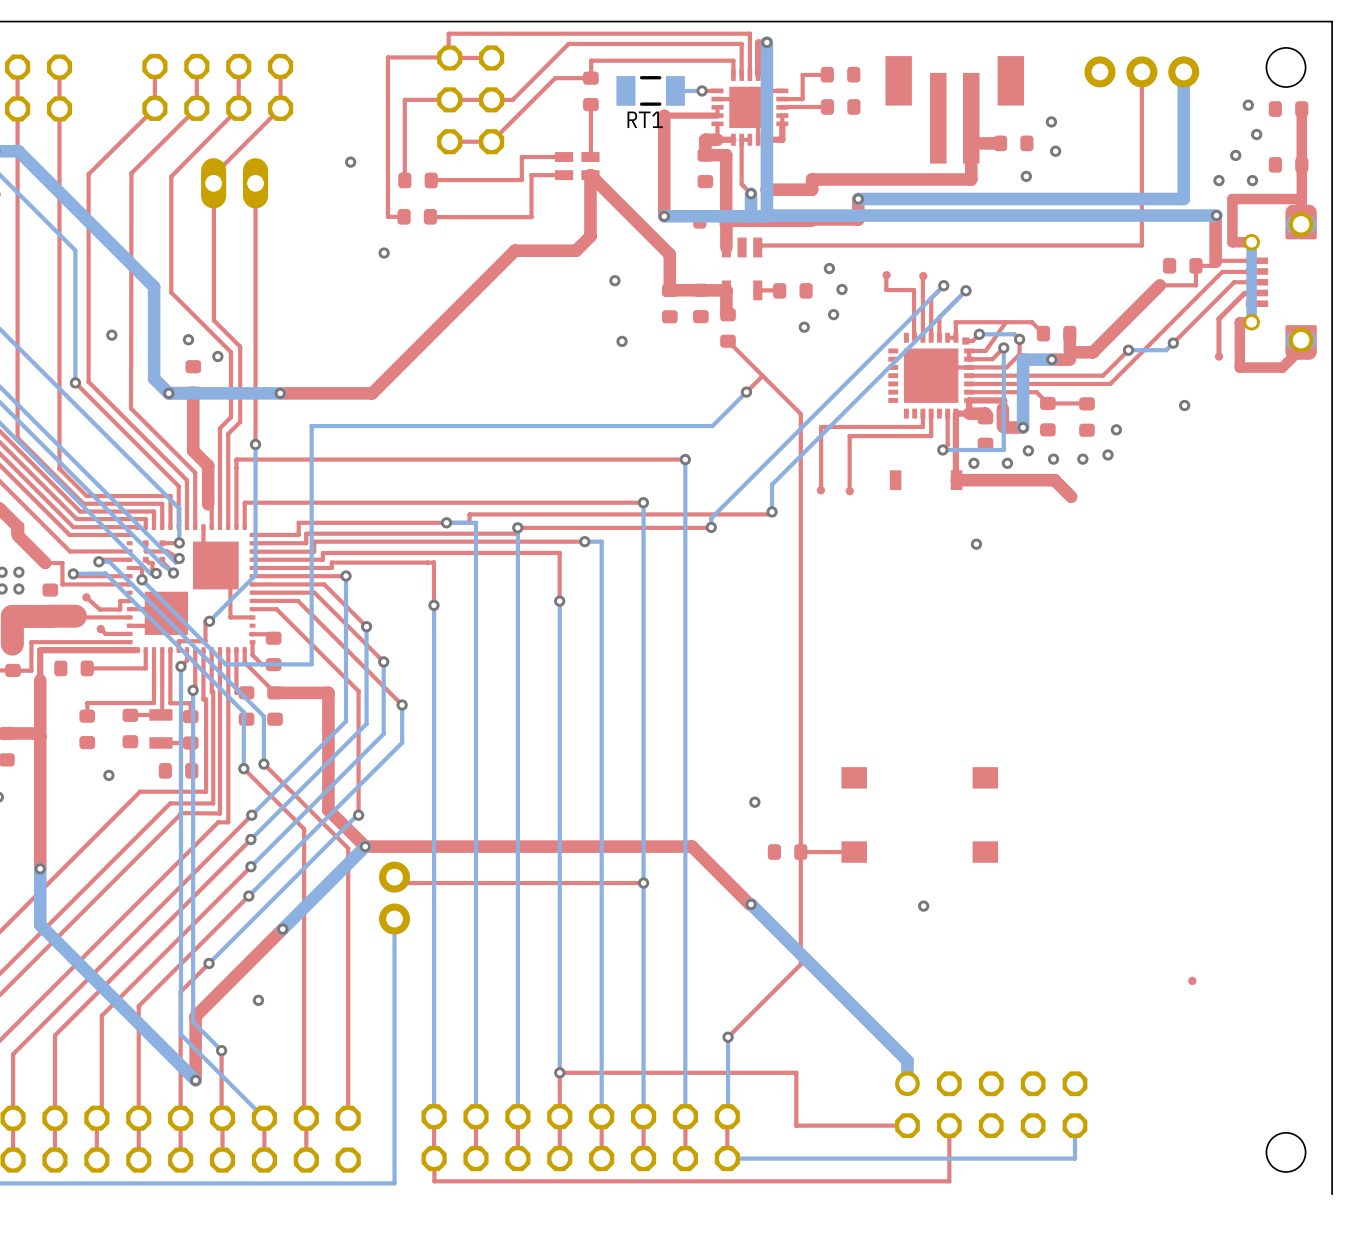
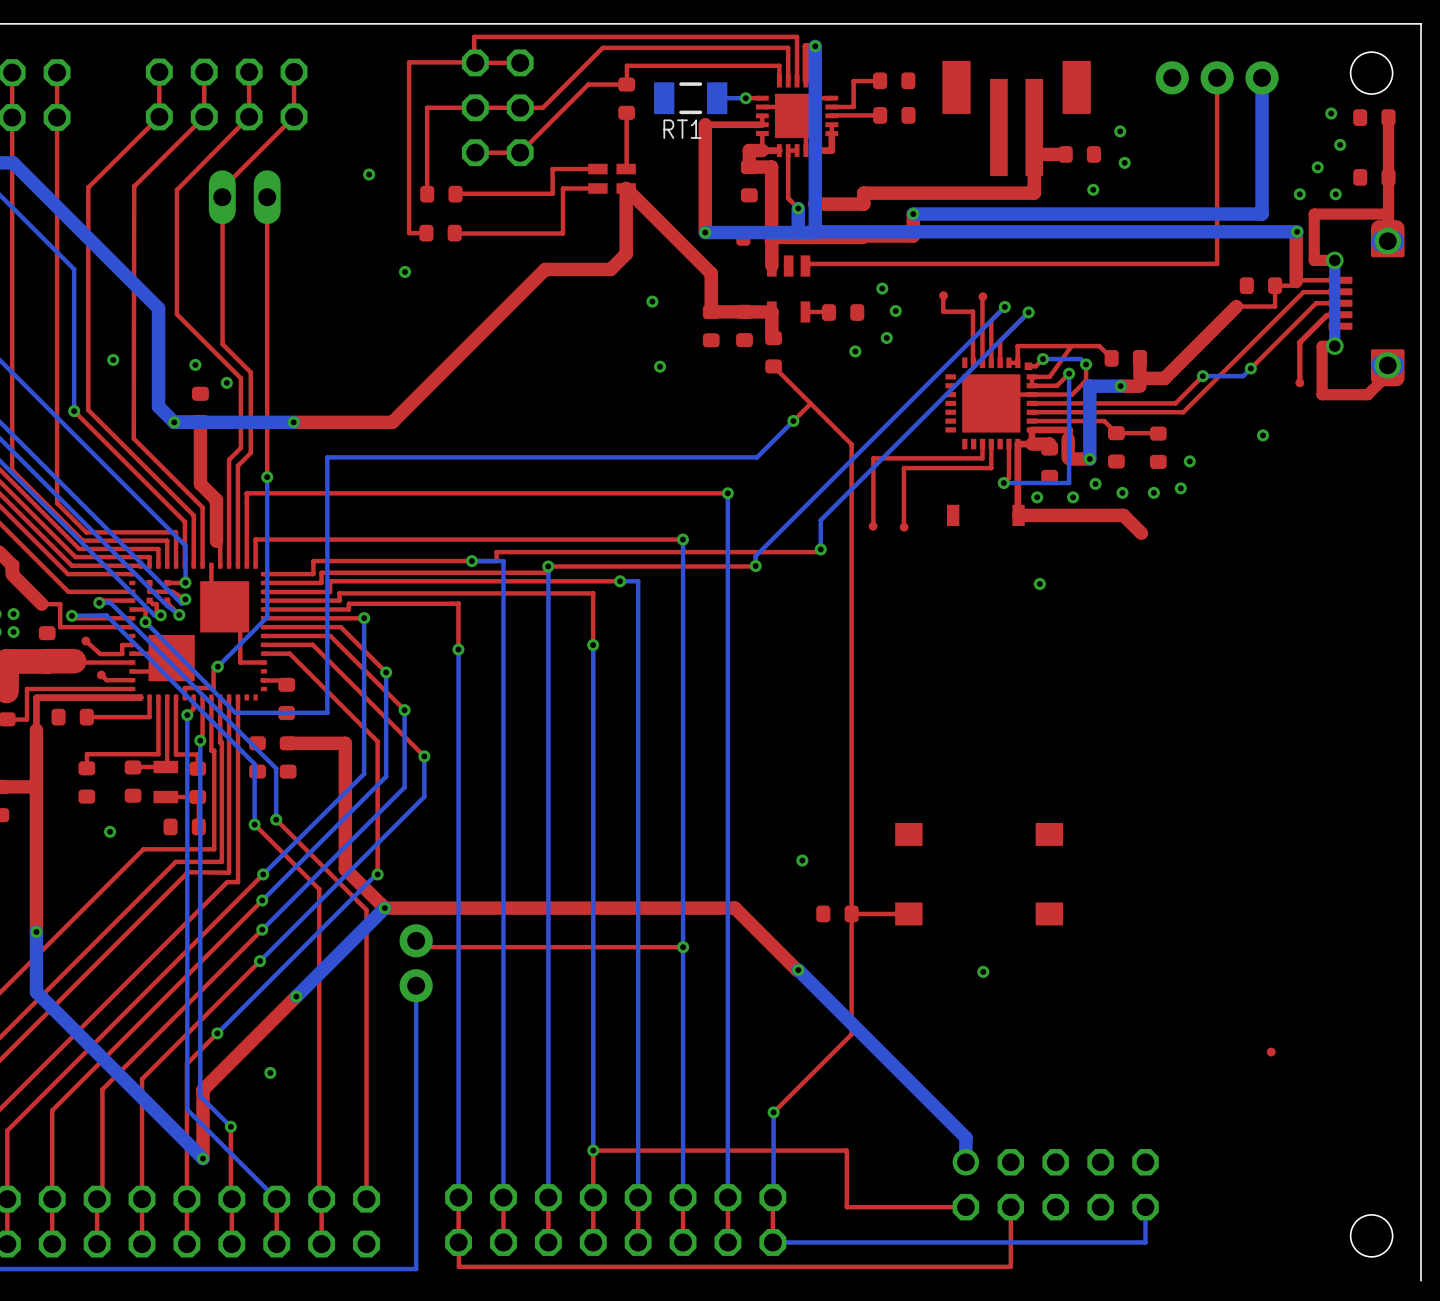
top track: (252, 642) (252, 655) (261, 664) (273, 664) -> none
top track: (236, 650) (236, 692) (246, 692) -> none
top track: (244, 650) (244, 662) (275, 692) -> none

